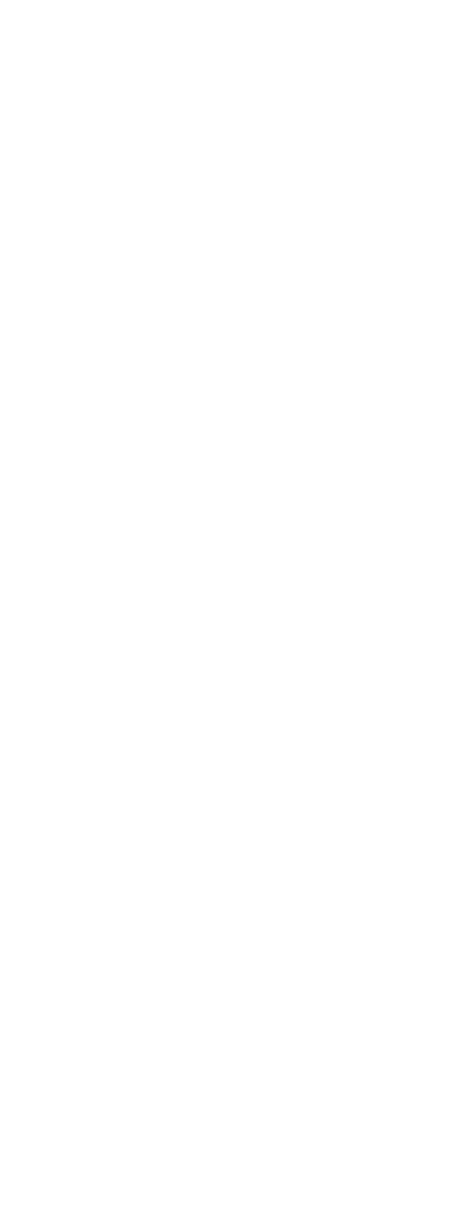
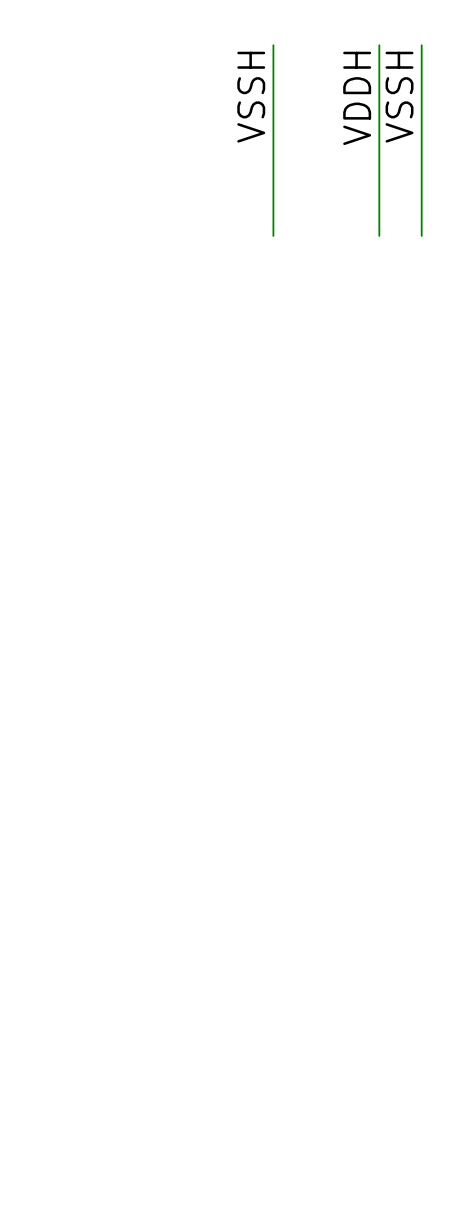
wire: none -> (273, 45) (273, 235)
wire: none -> (379, 45) (379, 235)
wire: none -> (421, 45) (421, 235)
label: none -> VSSH (251, 97)
label: none -> VSSH (399, 97)
label: none -> VDDH (357, 98)

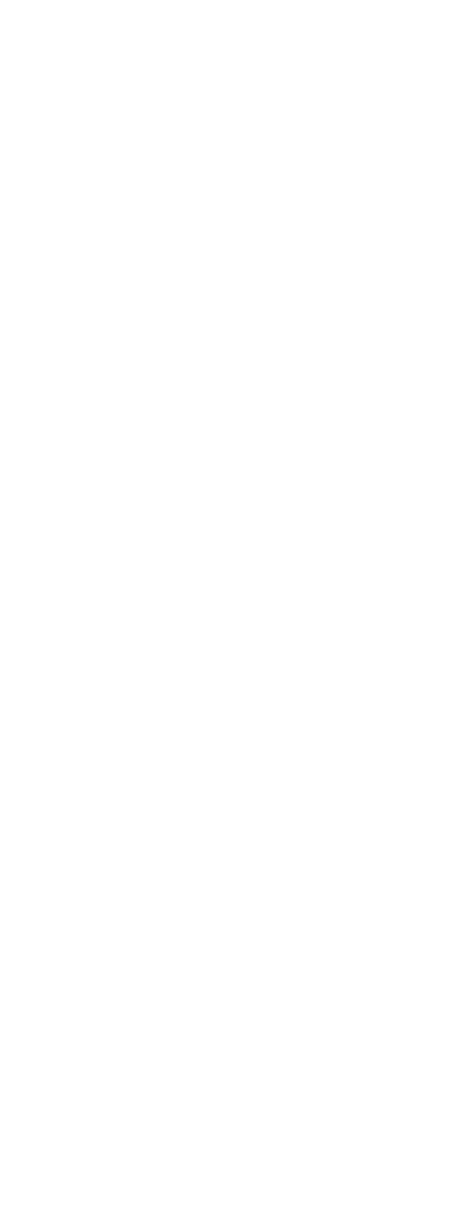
wire: (273, 45) (273, 235) -> none
wire: (379, 45) (379, 235) -> none
wire: (421, 45) (421, 235) -> none
label: VSSH (251, 97) -> none
label: VSSH (399, 97) -> none
label: VDDH (357, 98) -> none

